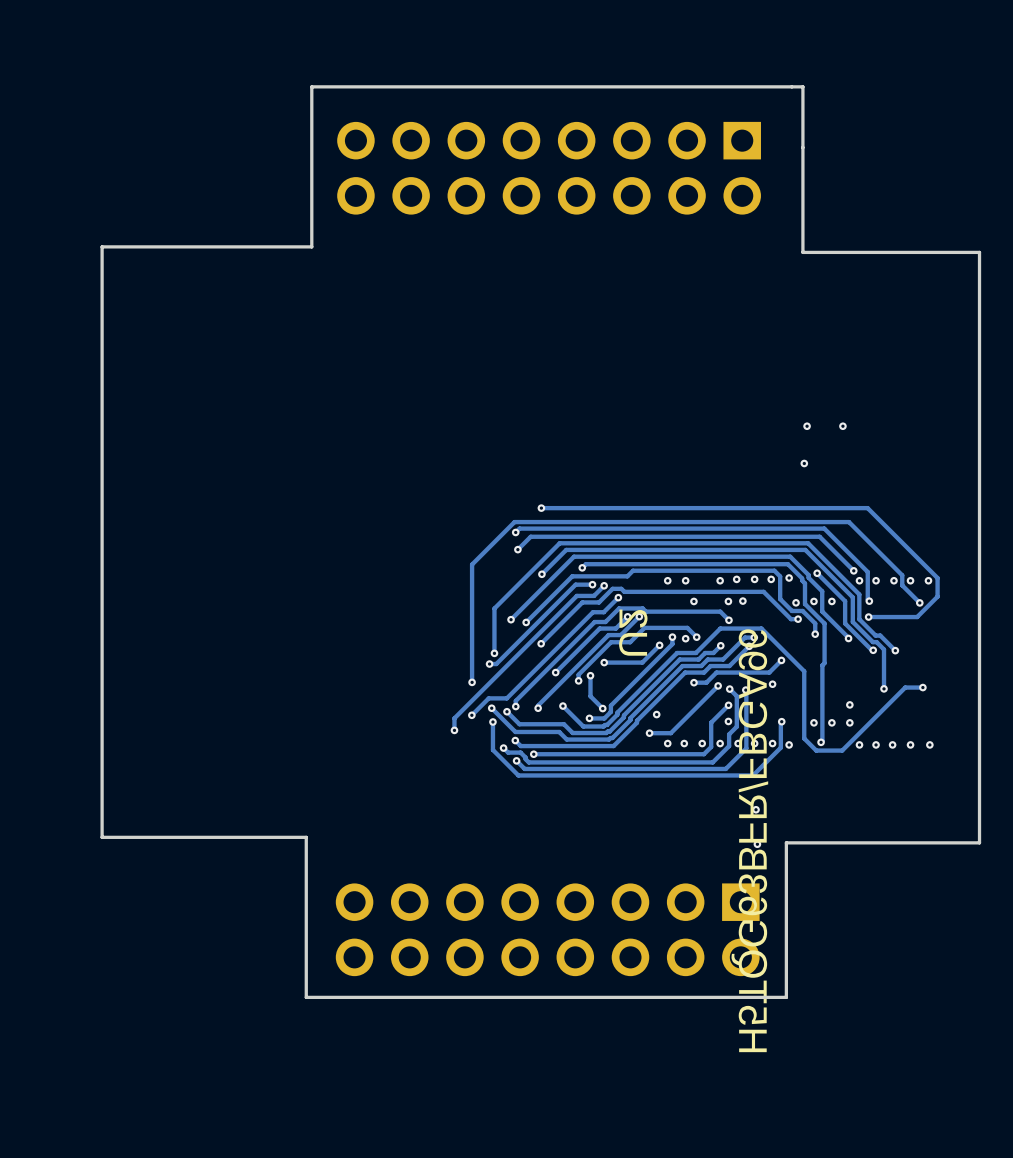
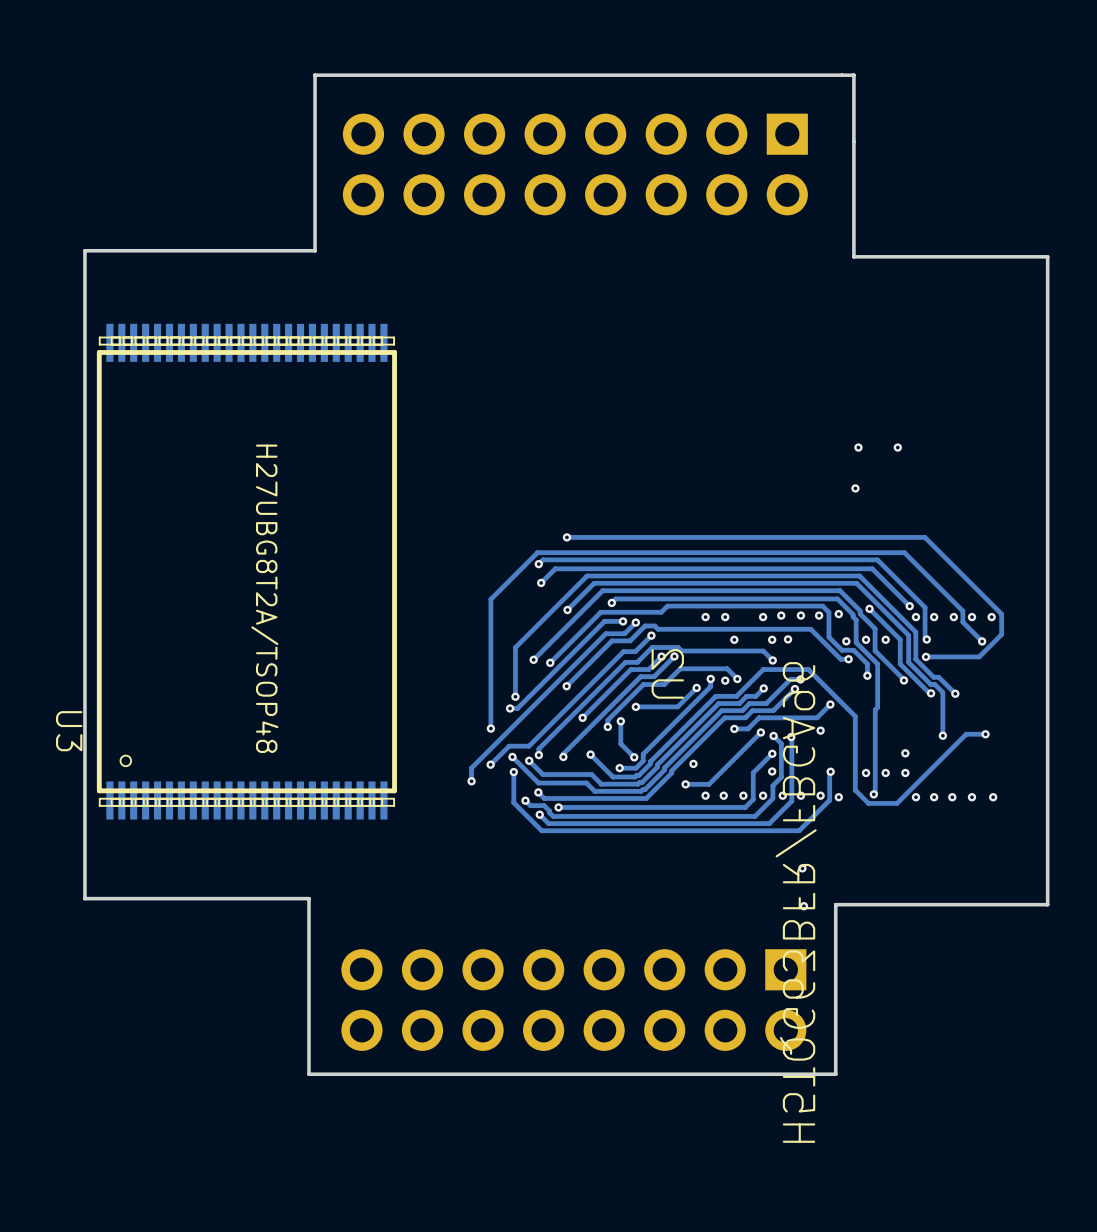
U3: none -> H27UBG8T2A/TSOP48 (246, 571)

